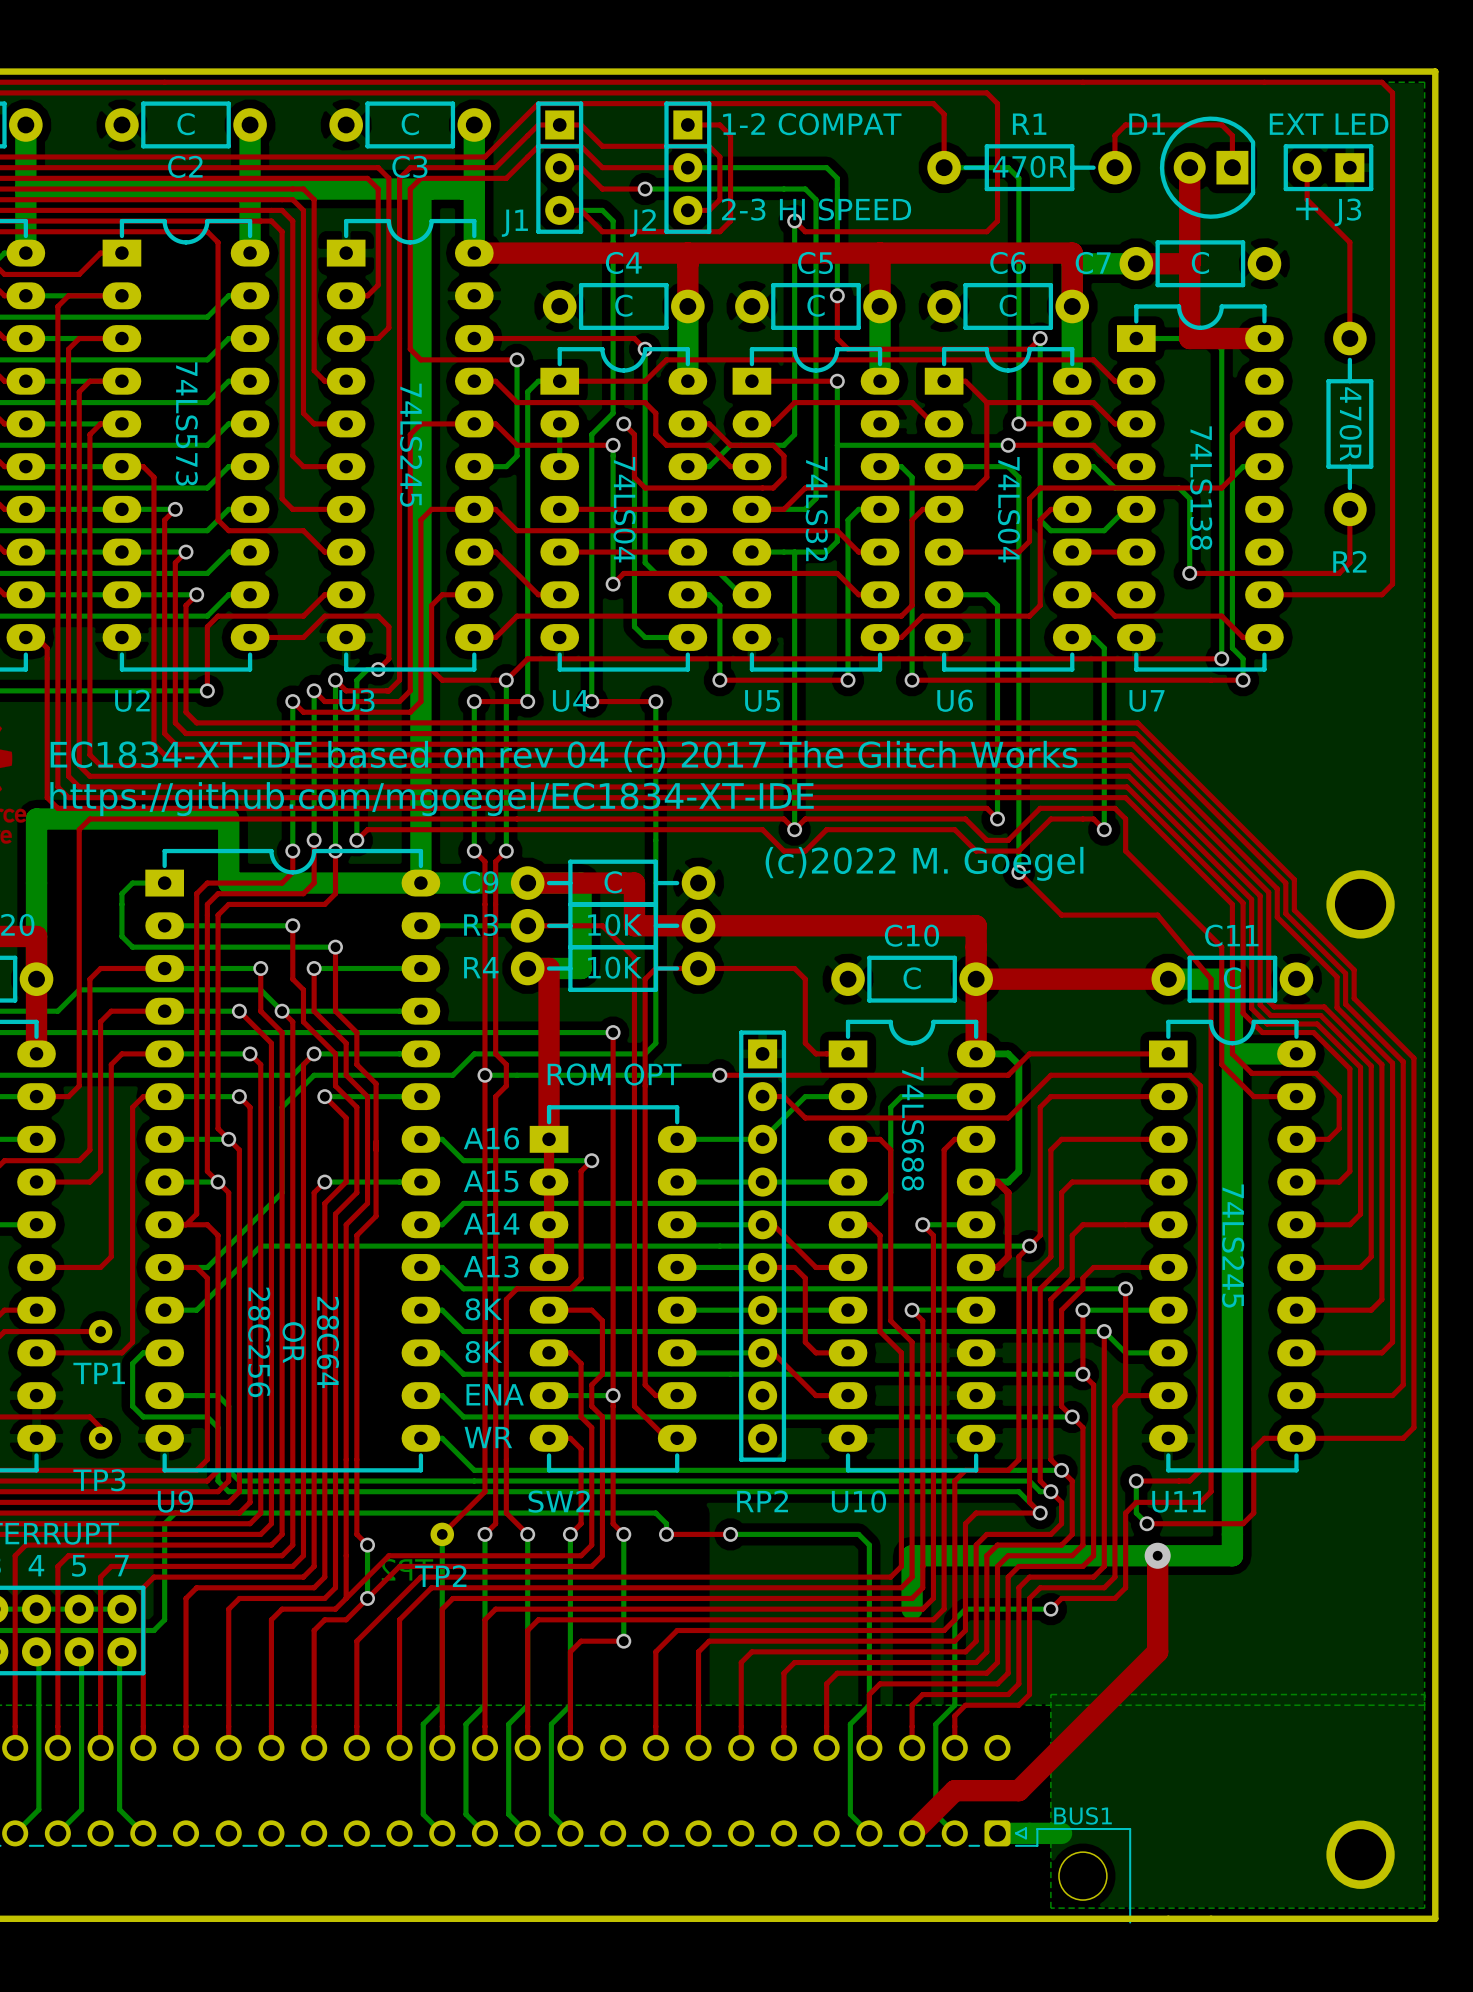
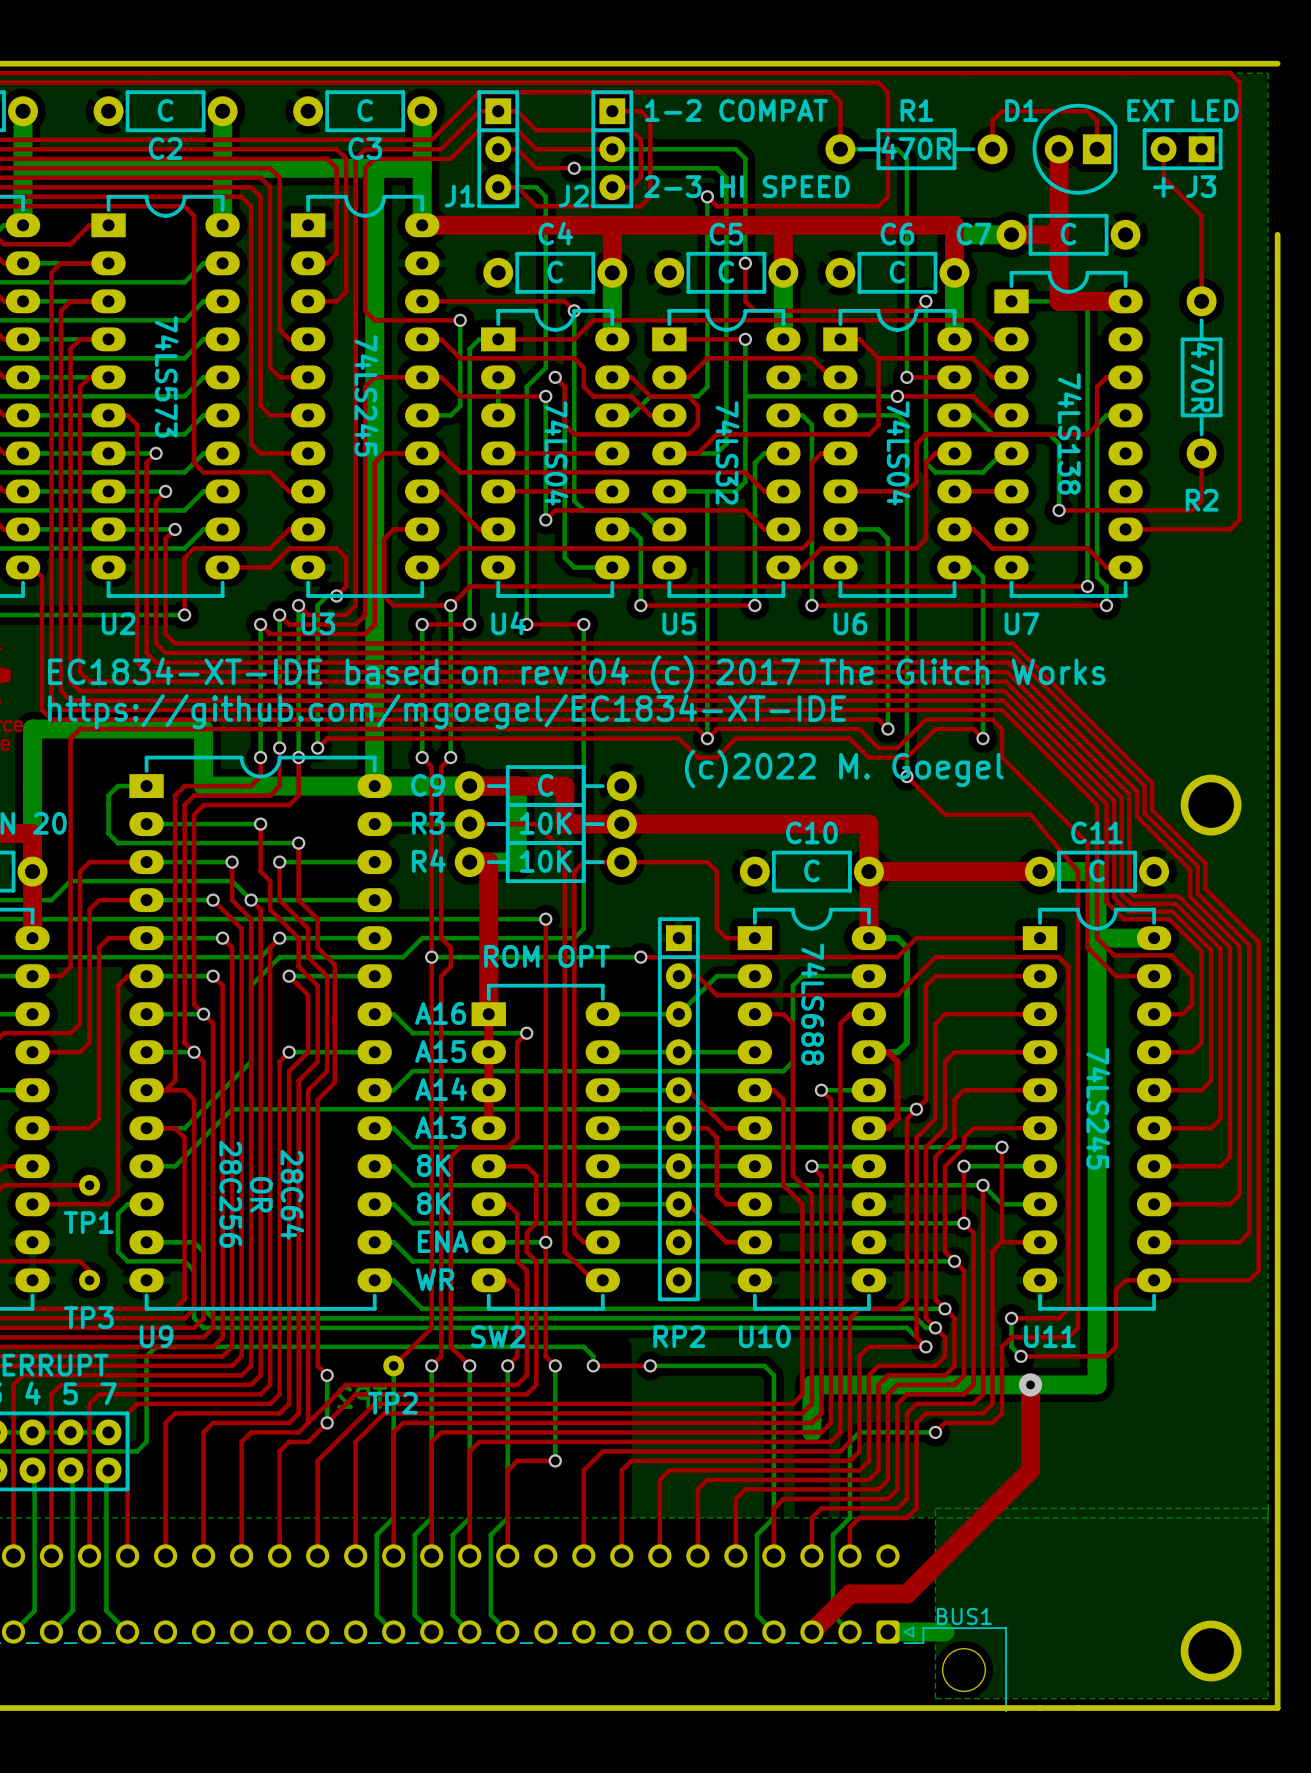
board edge: (1435, 71) (1435, 263) -> none

